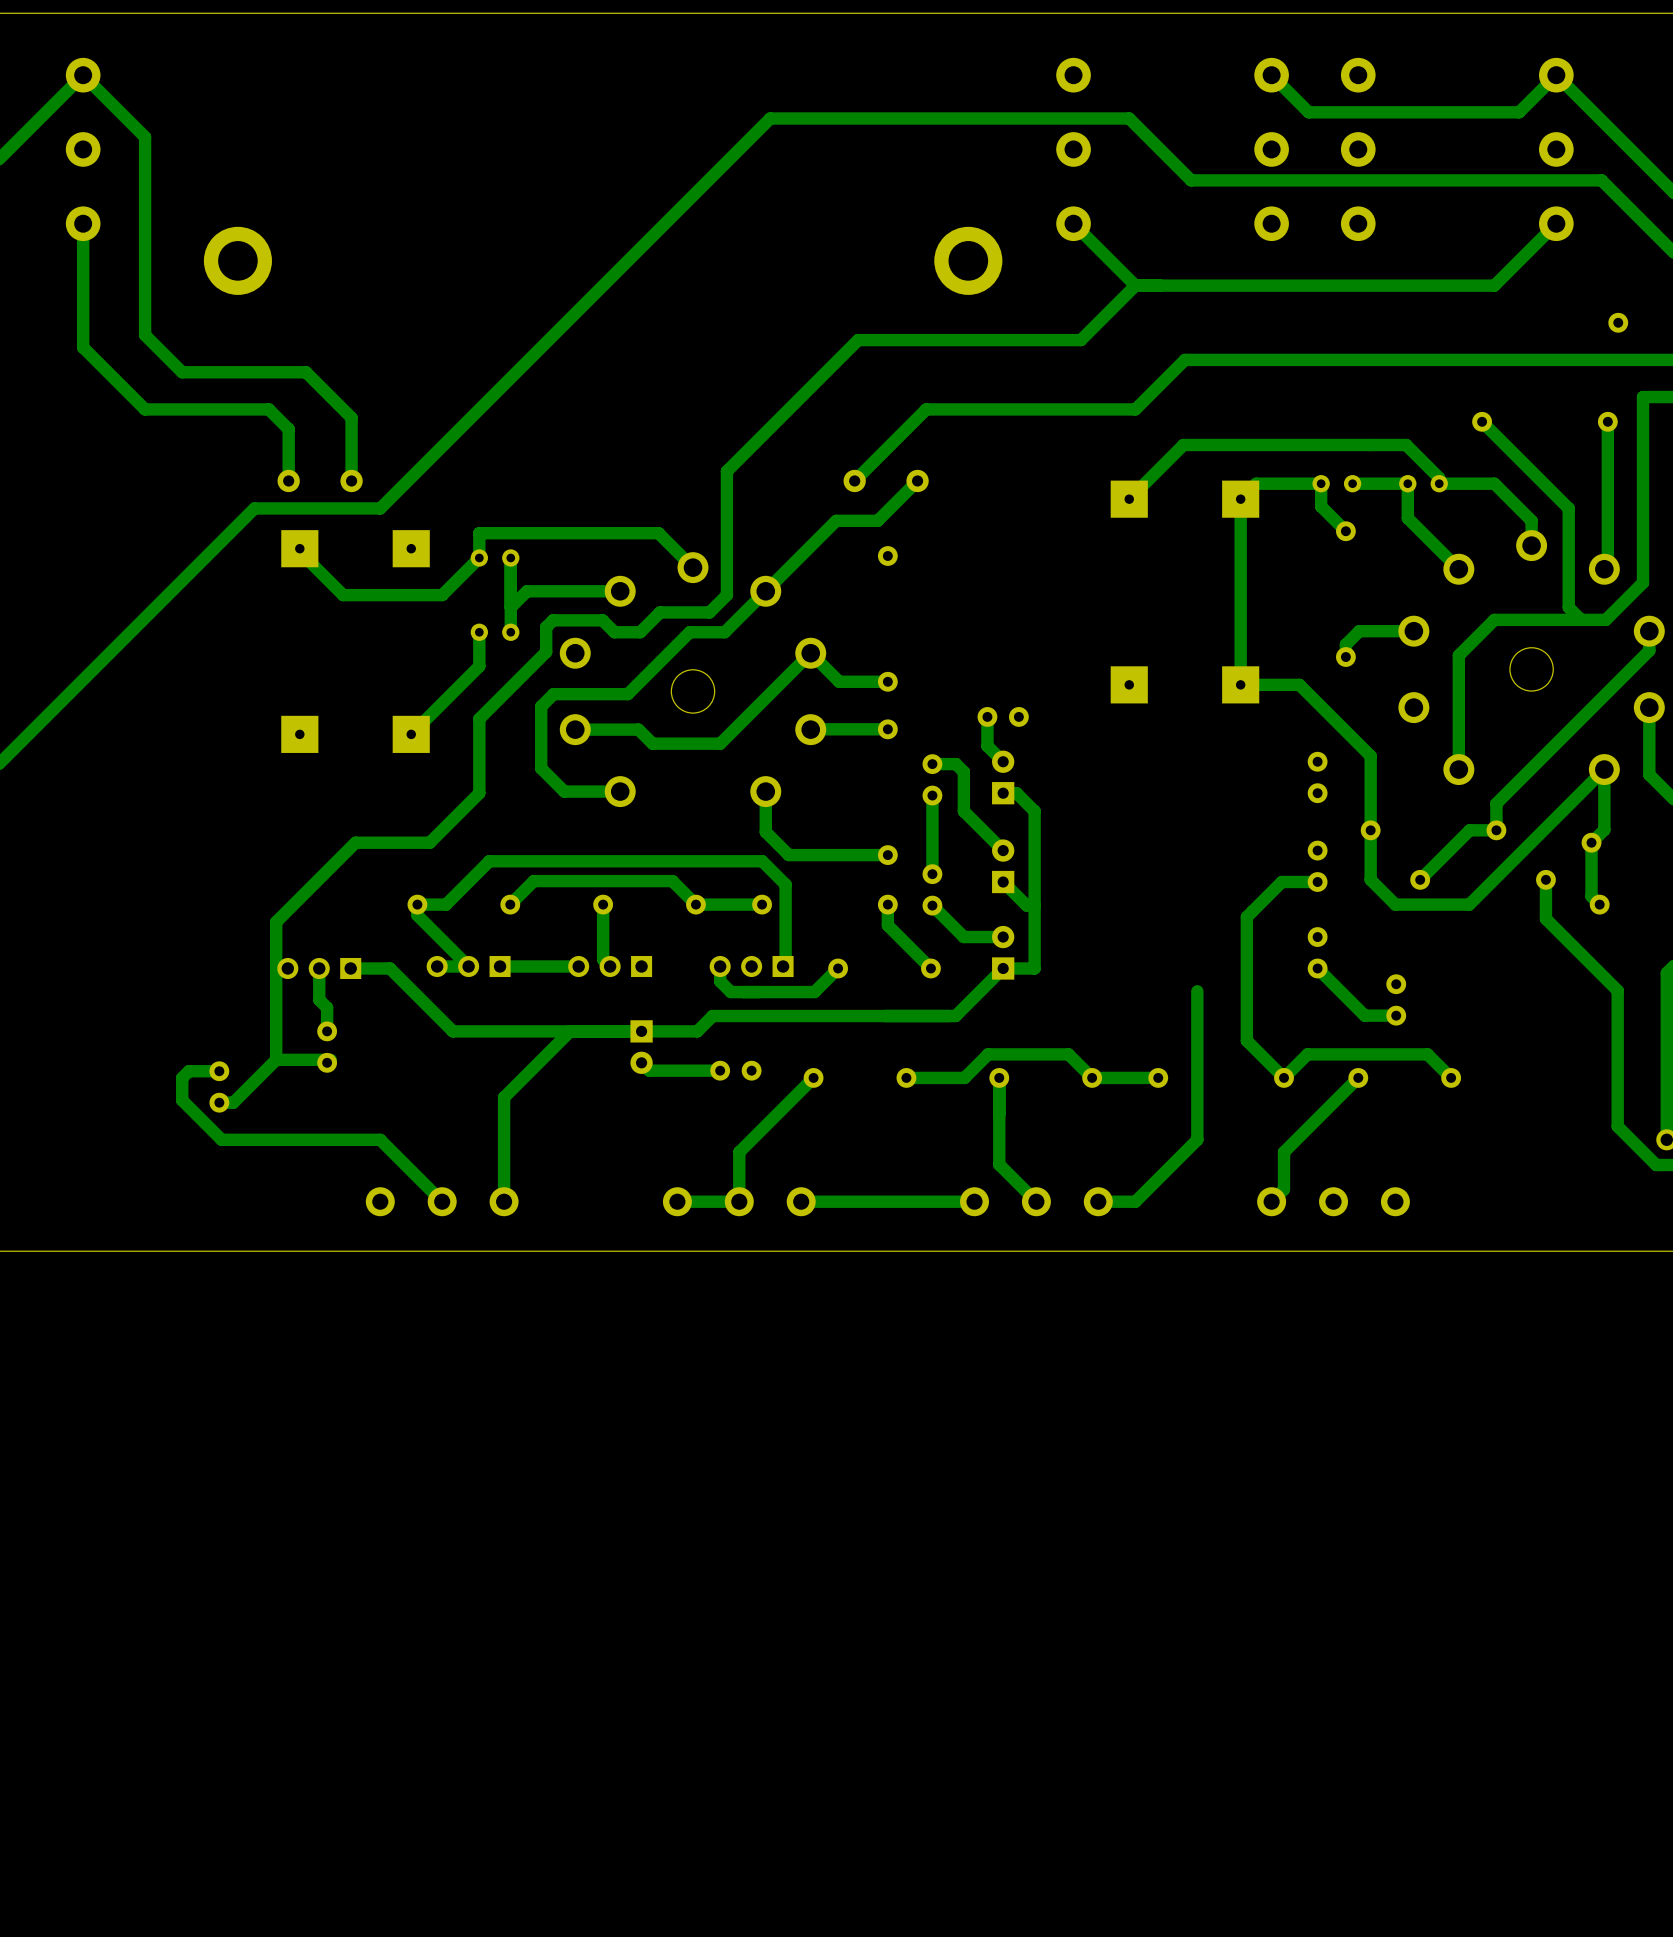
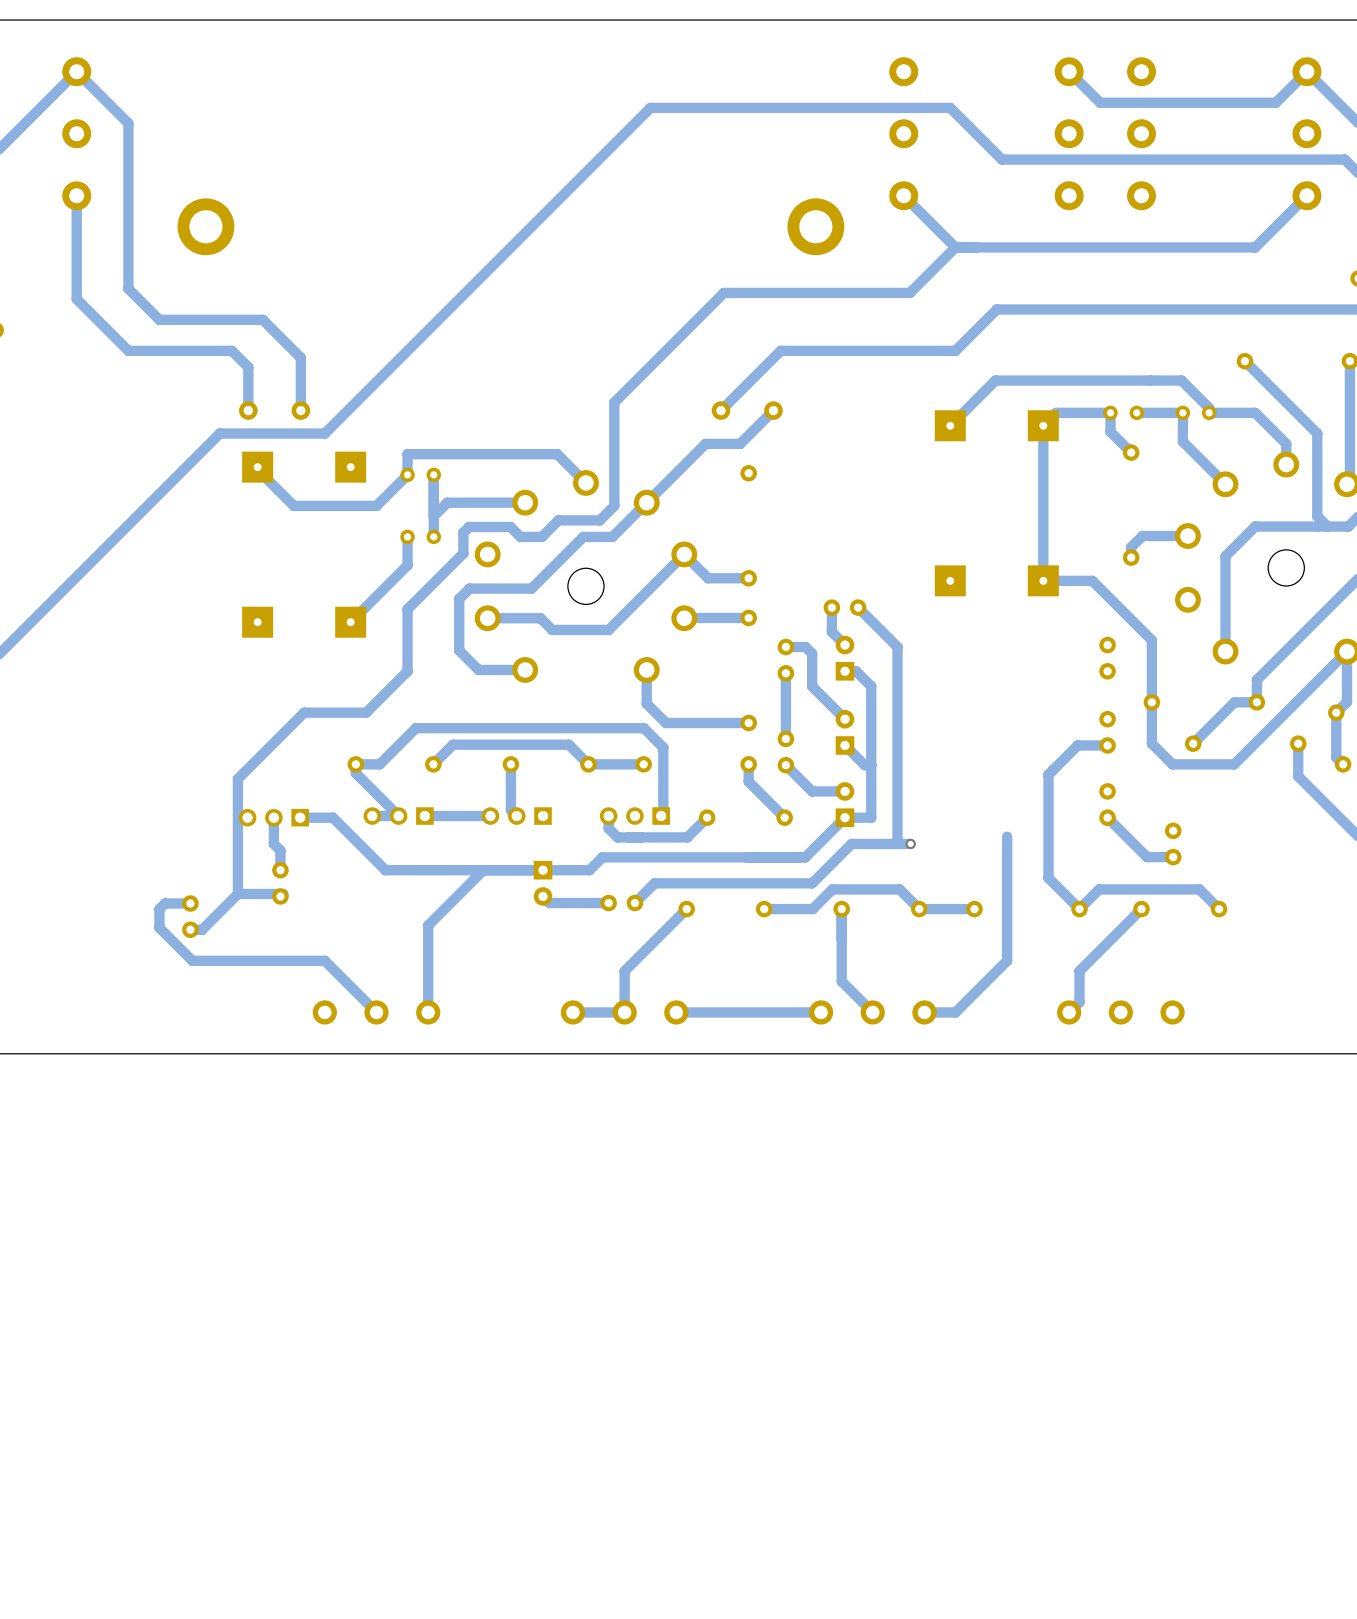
track: none -> (858, 607) (897, 647) (897, 843)
track: none -> (910, 843) (851, 843) (812, 883) (654, 883) (634, 903)
via: none -> (910, 843)

